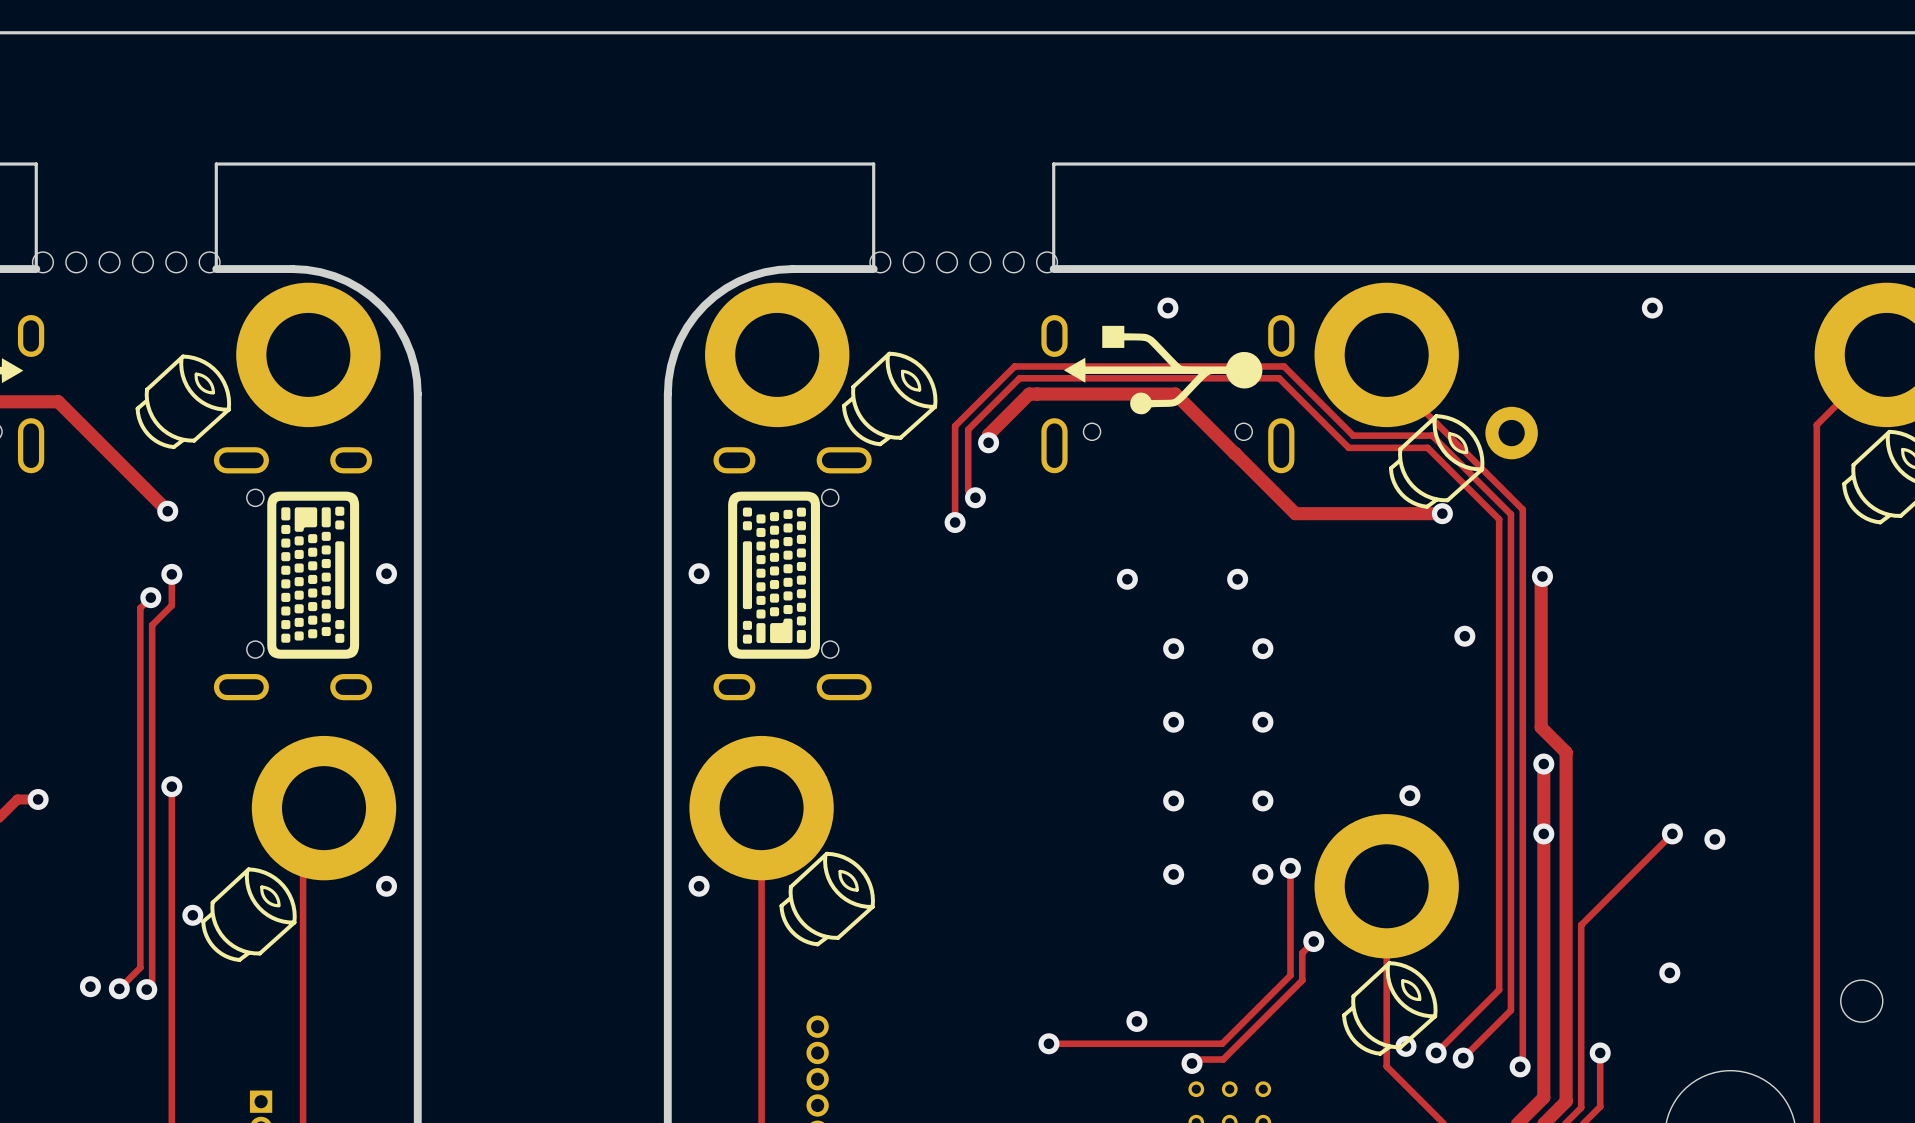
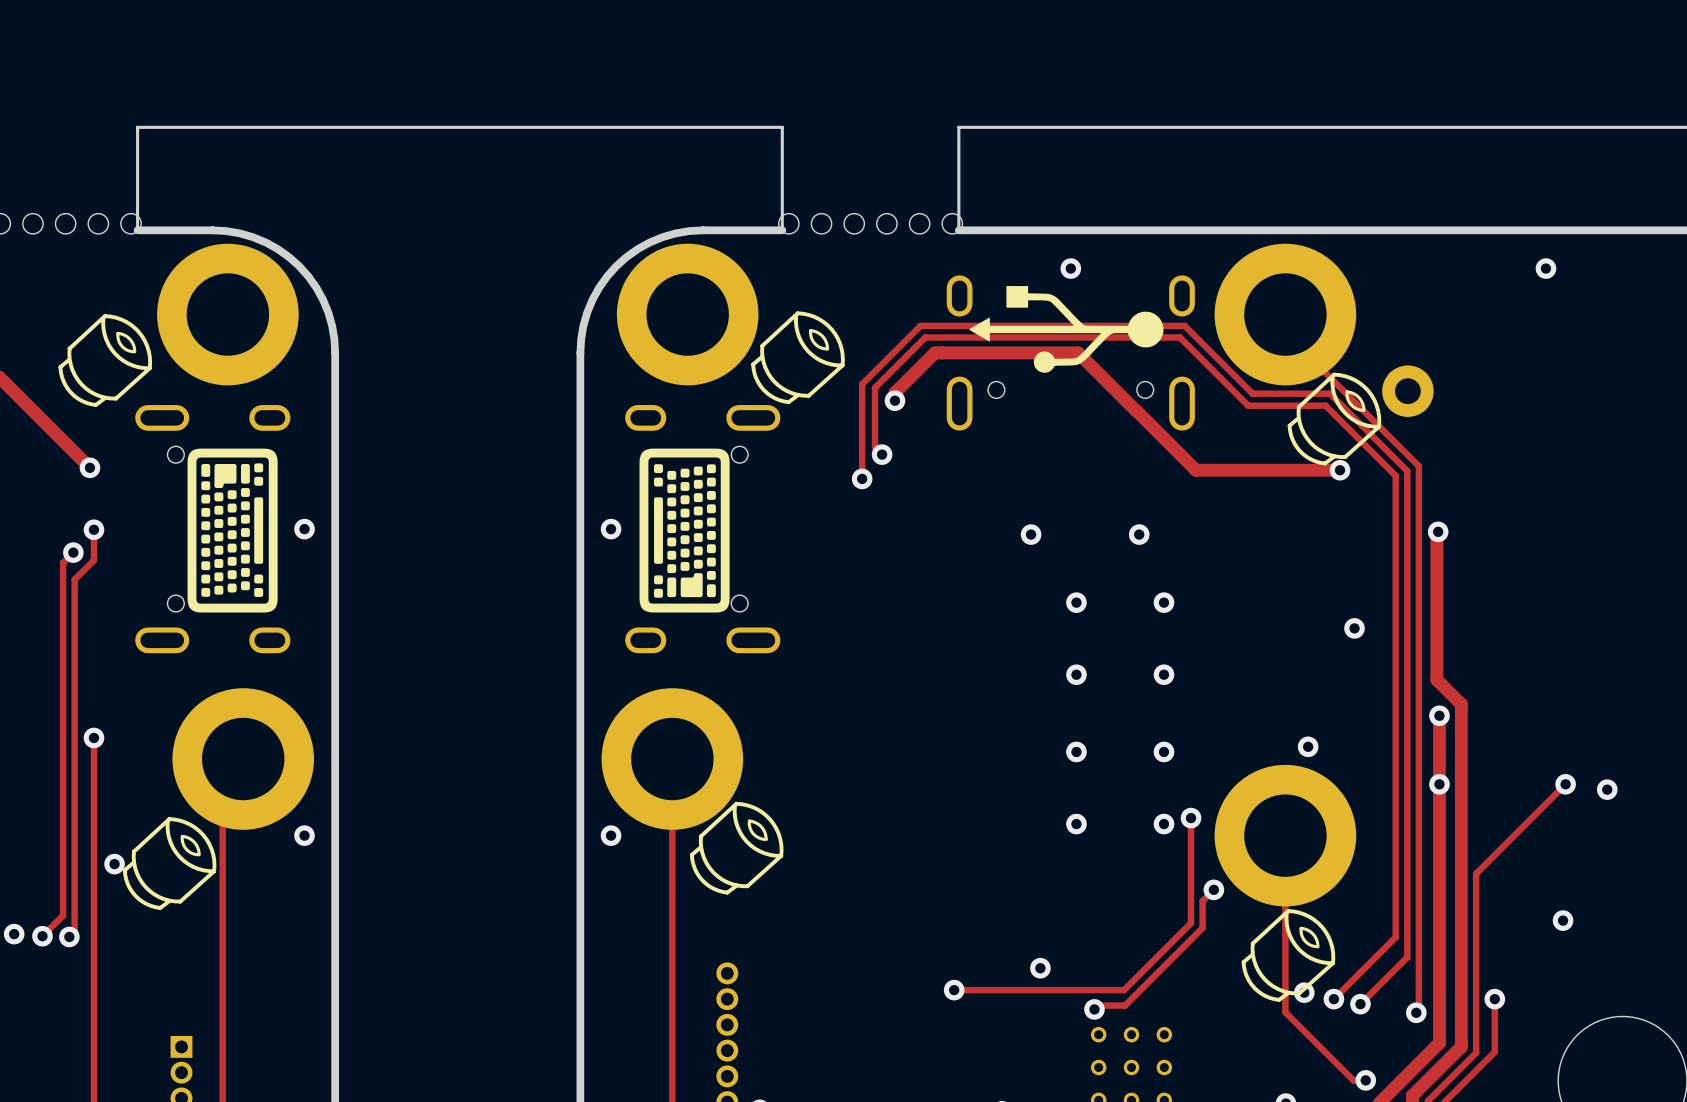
via position: (1464, 636) -> (1354, 628)

